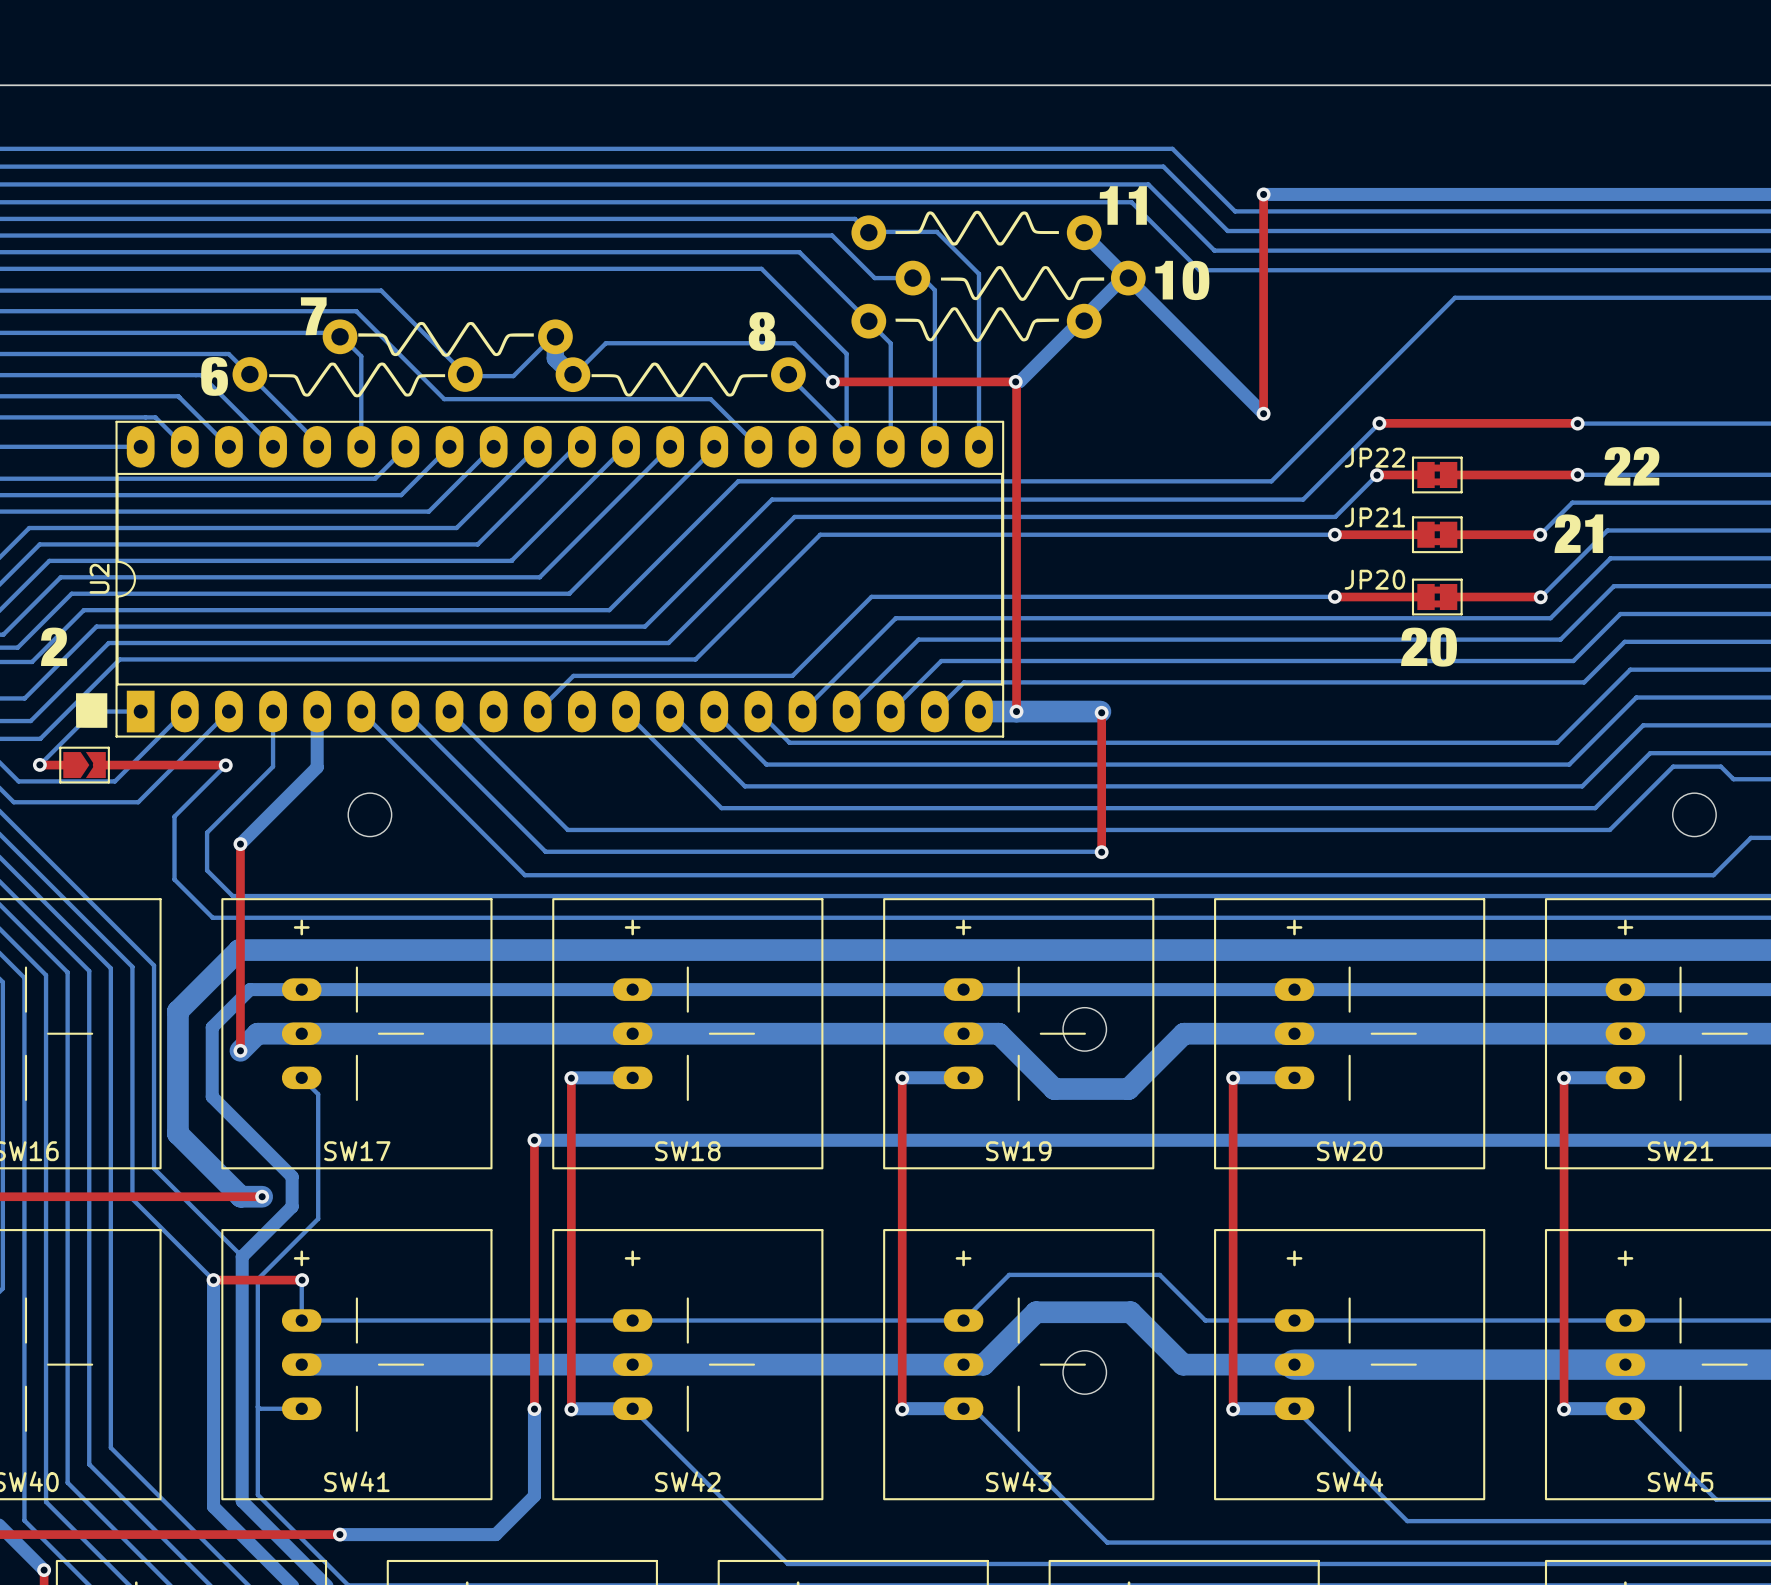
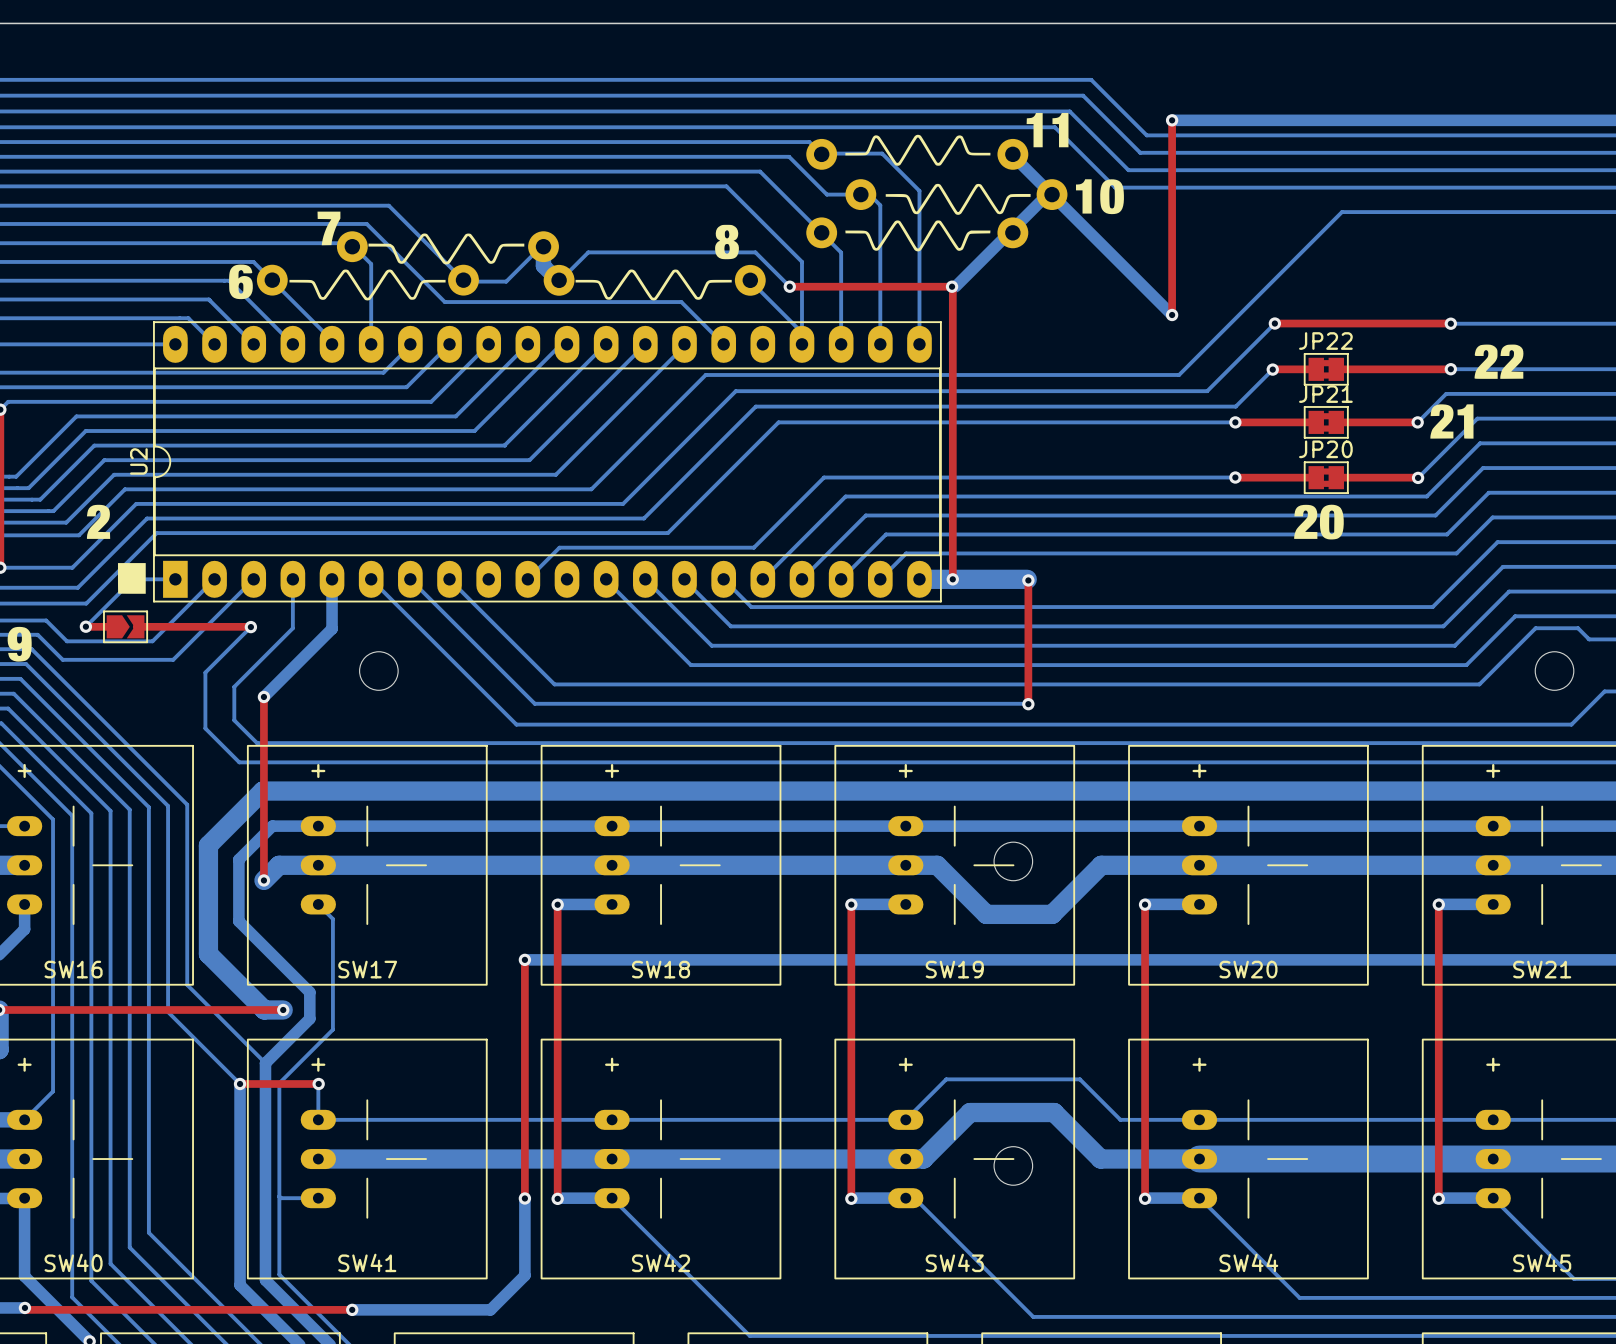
JP22 name position: JP22 (1374, 457) -> JP22 (1325, 341)
JP21 name position: JP21 (1374, 517) -> JP21 (1325, 394)
JP20 name position: JP20 (1374, 579) -> JP20 (1325, 449)

